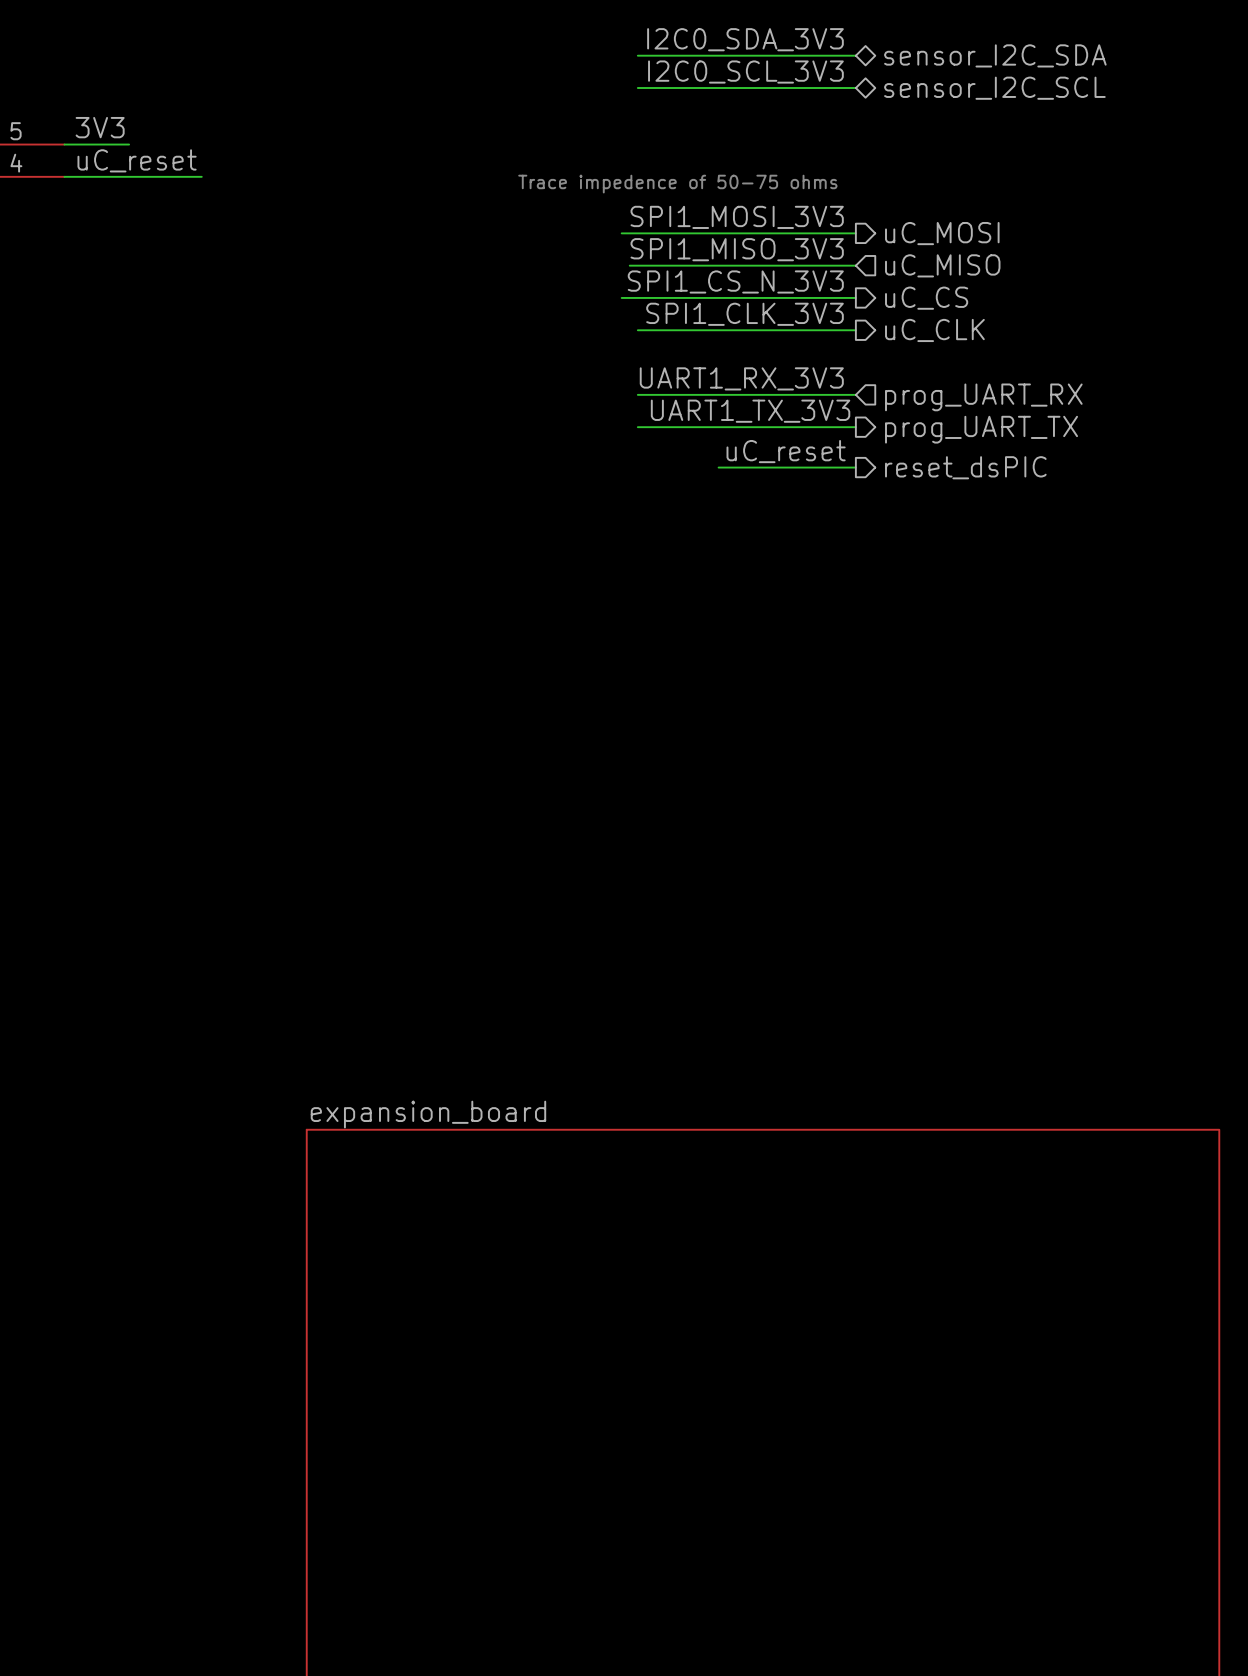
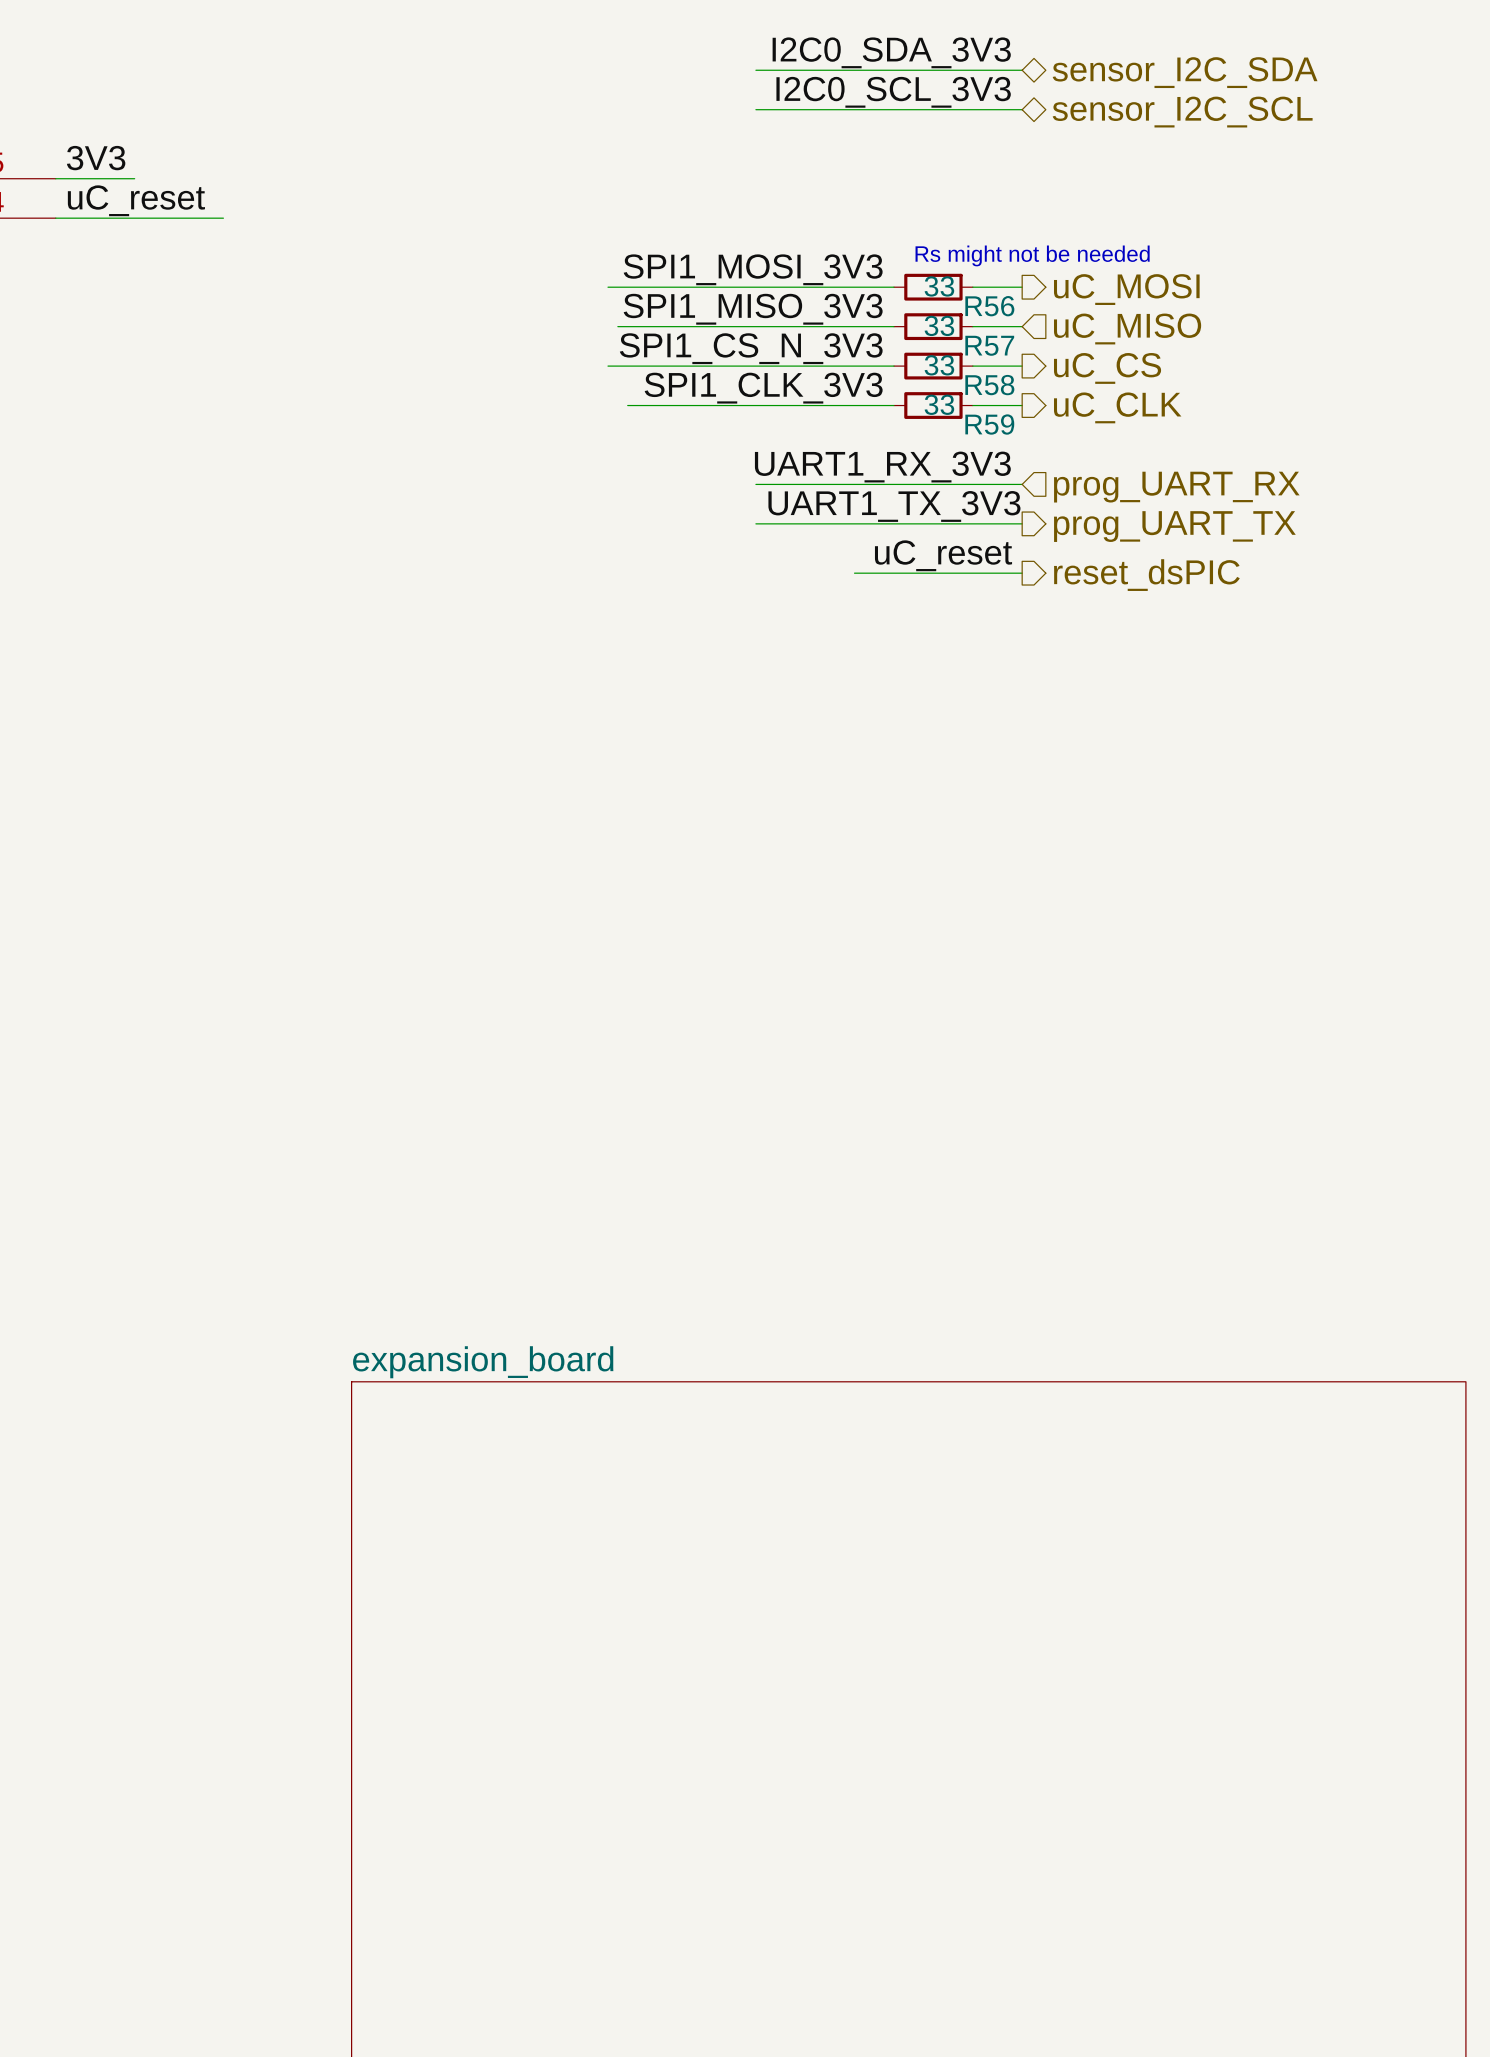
text: Trace impedence of 50-75 ohms (677, 184) -> none
text: none -> Rs might not be needed (1032, 255)
label position: SPI1_MOSI_3V3 (737, 217) -> SPI1_MOSI_3V3 (753, 269)
wire: none -> (608, 287) (736, 287)
wire: (750, 233) (815, 233) -> none
R56: none -> 33 (933, 287)
label position: SPI1_MISO_3V3 (737, 249) -> SPI1_MISO_3V3 (753, 309)
wire: none -> (617, 326) (746, 326)
wire: (750, 265) (815, 265) -> none
R57: none -> 33 (933, 326)
label position: SPI1_CS_N_3V3 (735, 281) -> SPI1_CS_N_3V3 (751, 348)
wire: none -> (608, 366) (736, 366)
wire: (750, 297) (815, 297) -> none
R58: none -> 33 (933, 366)
label position: SPI1_CLK_3V3 (745, 314) -> SPI1_CLK_3V3 (763, 388)
wire: none -> (627, 405) (755, 405)
wire: (750, 330) (815, 330) -> none
R59: none -> 33 (933, 405)

